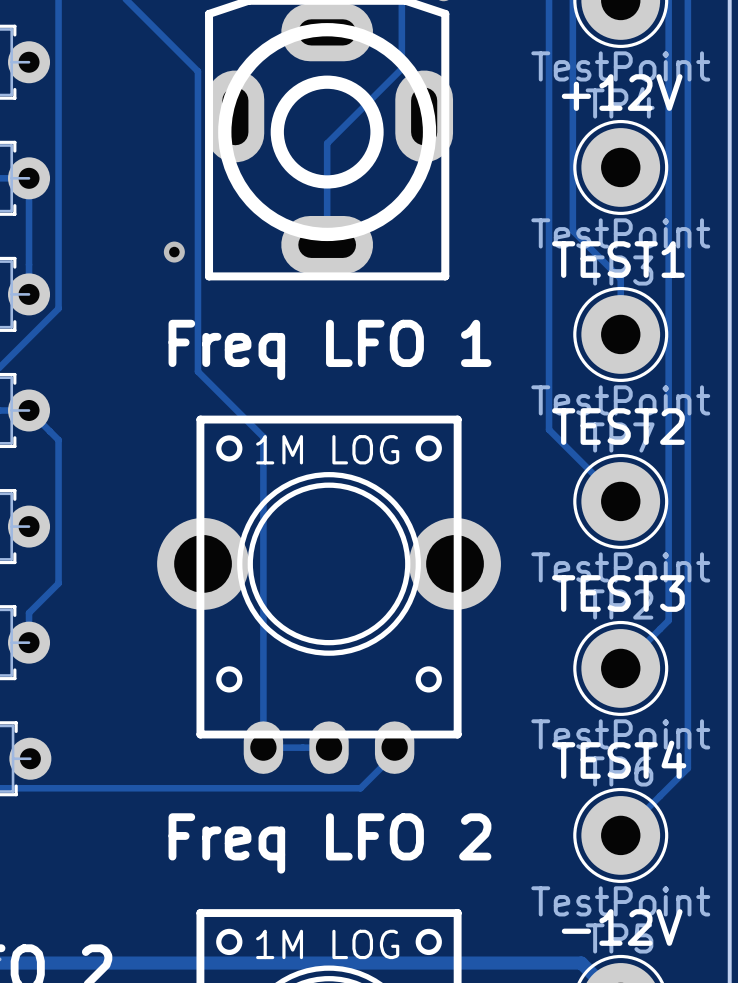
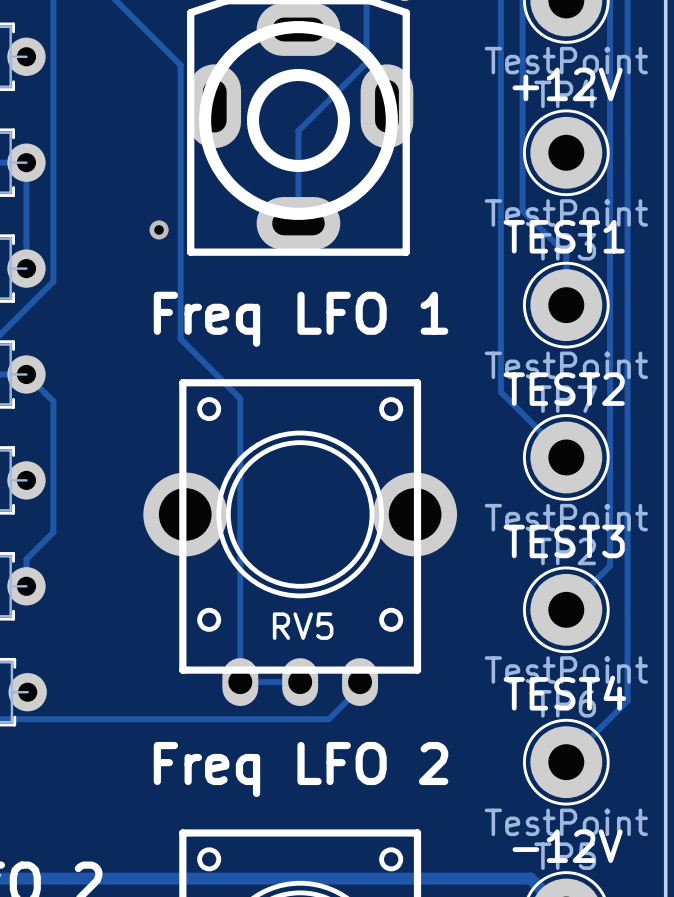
RV5 value: 1M LOG (327, 449) -> none
RV5 name: none -> RV5 (303, 626)
part value: 1M LOG (327, 944) -> none

